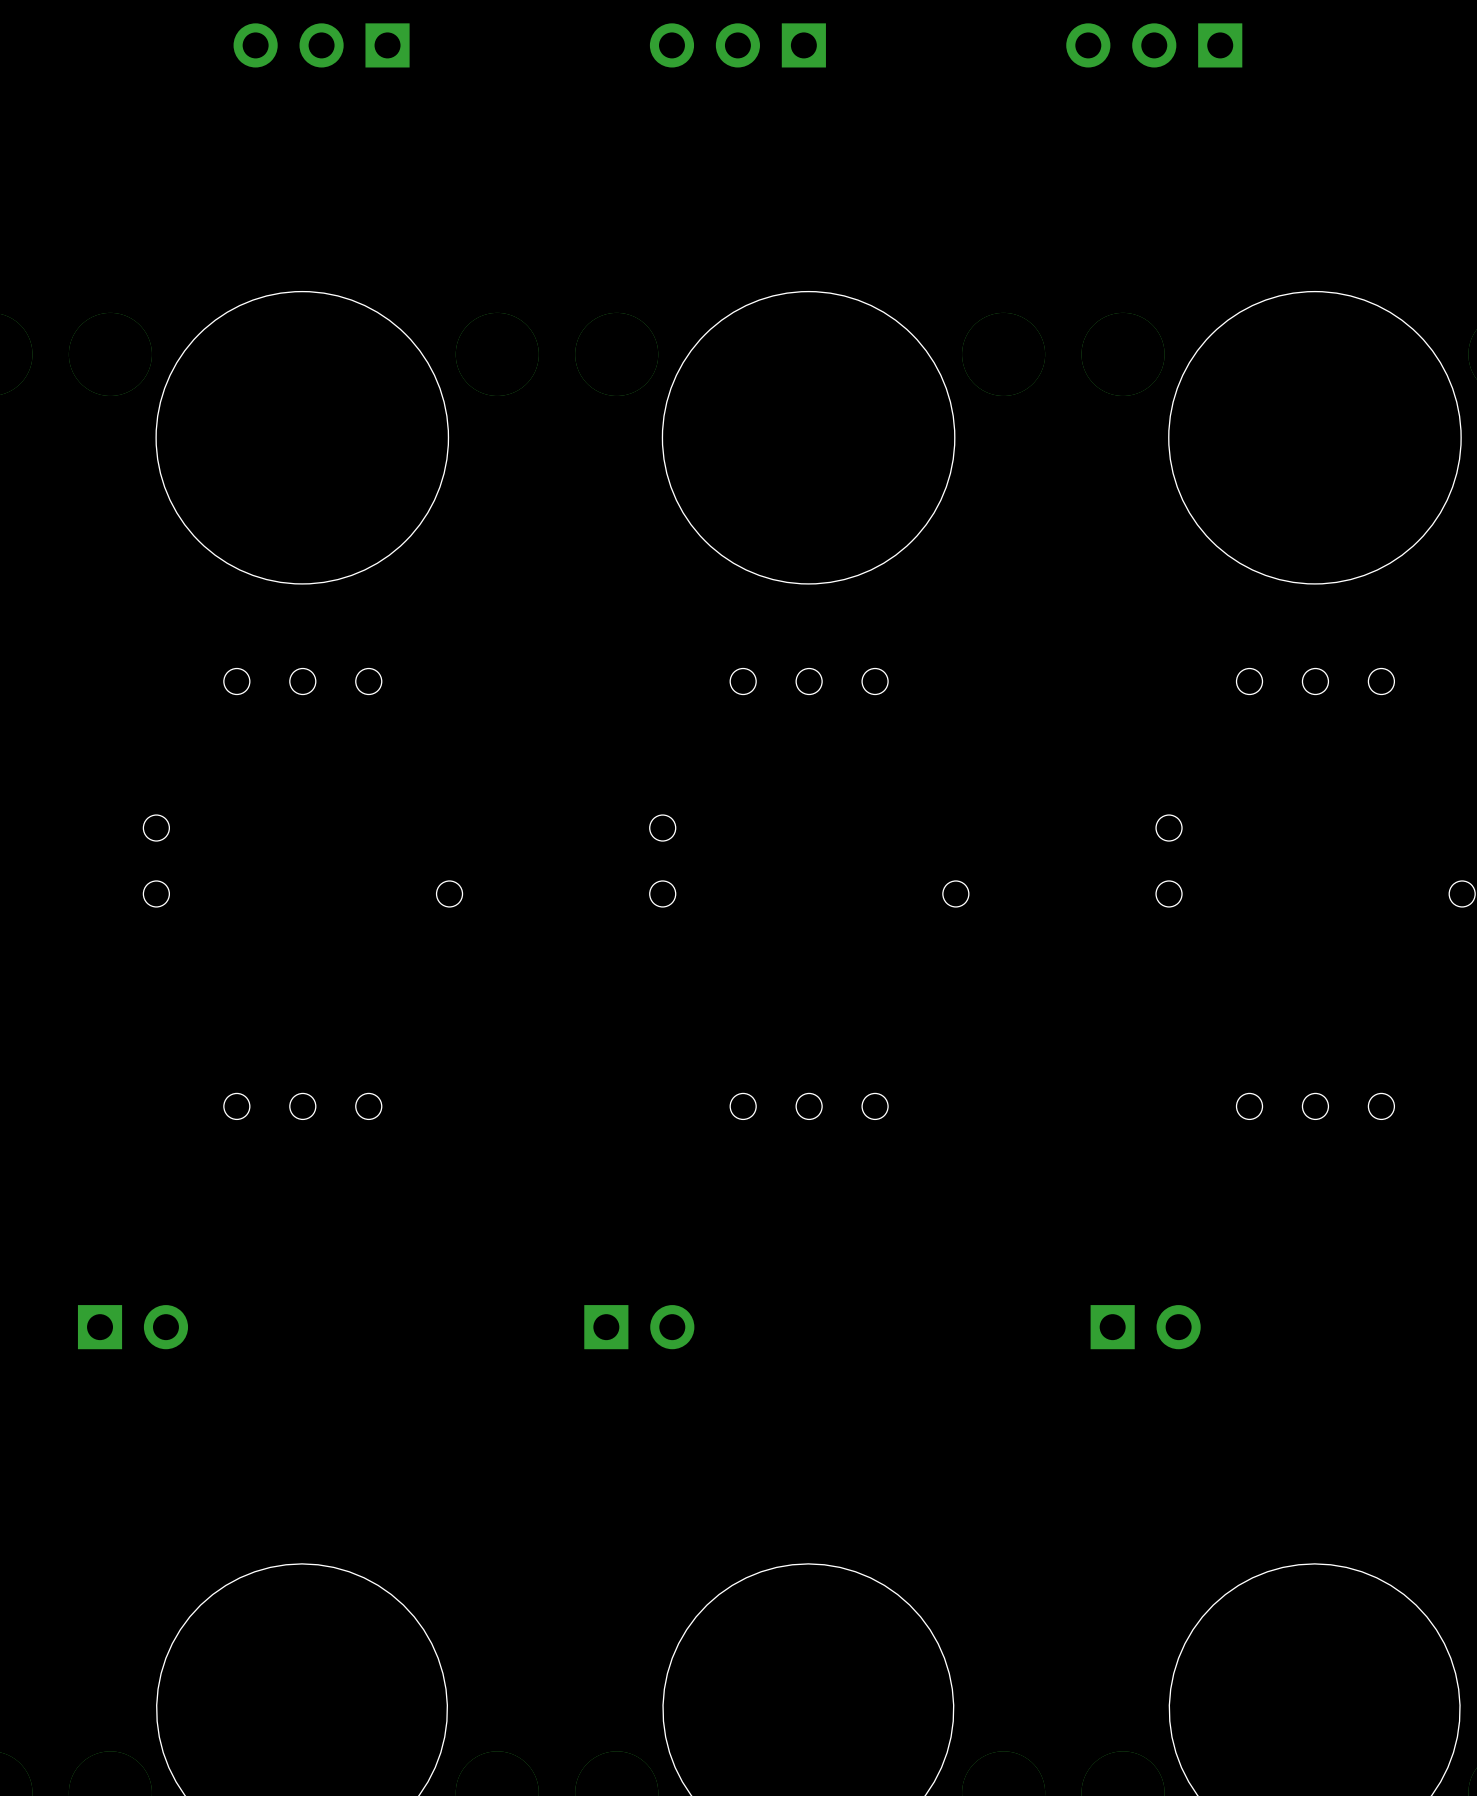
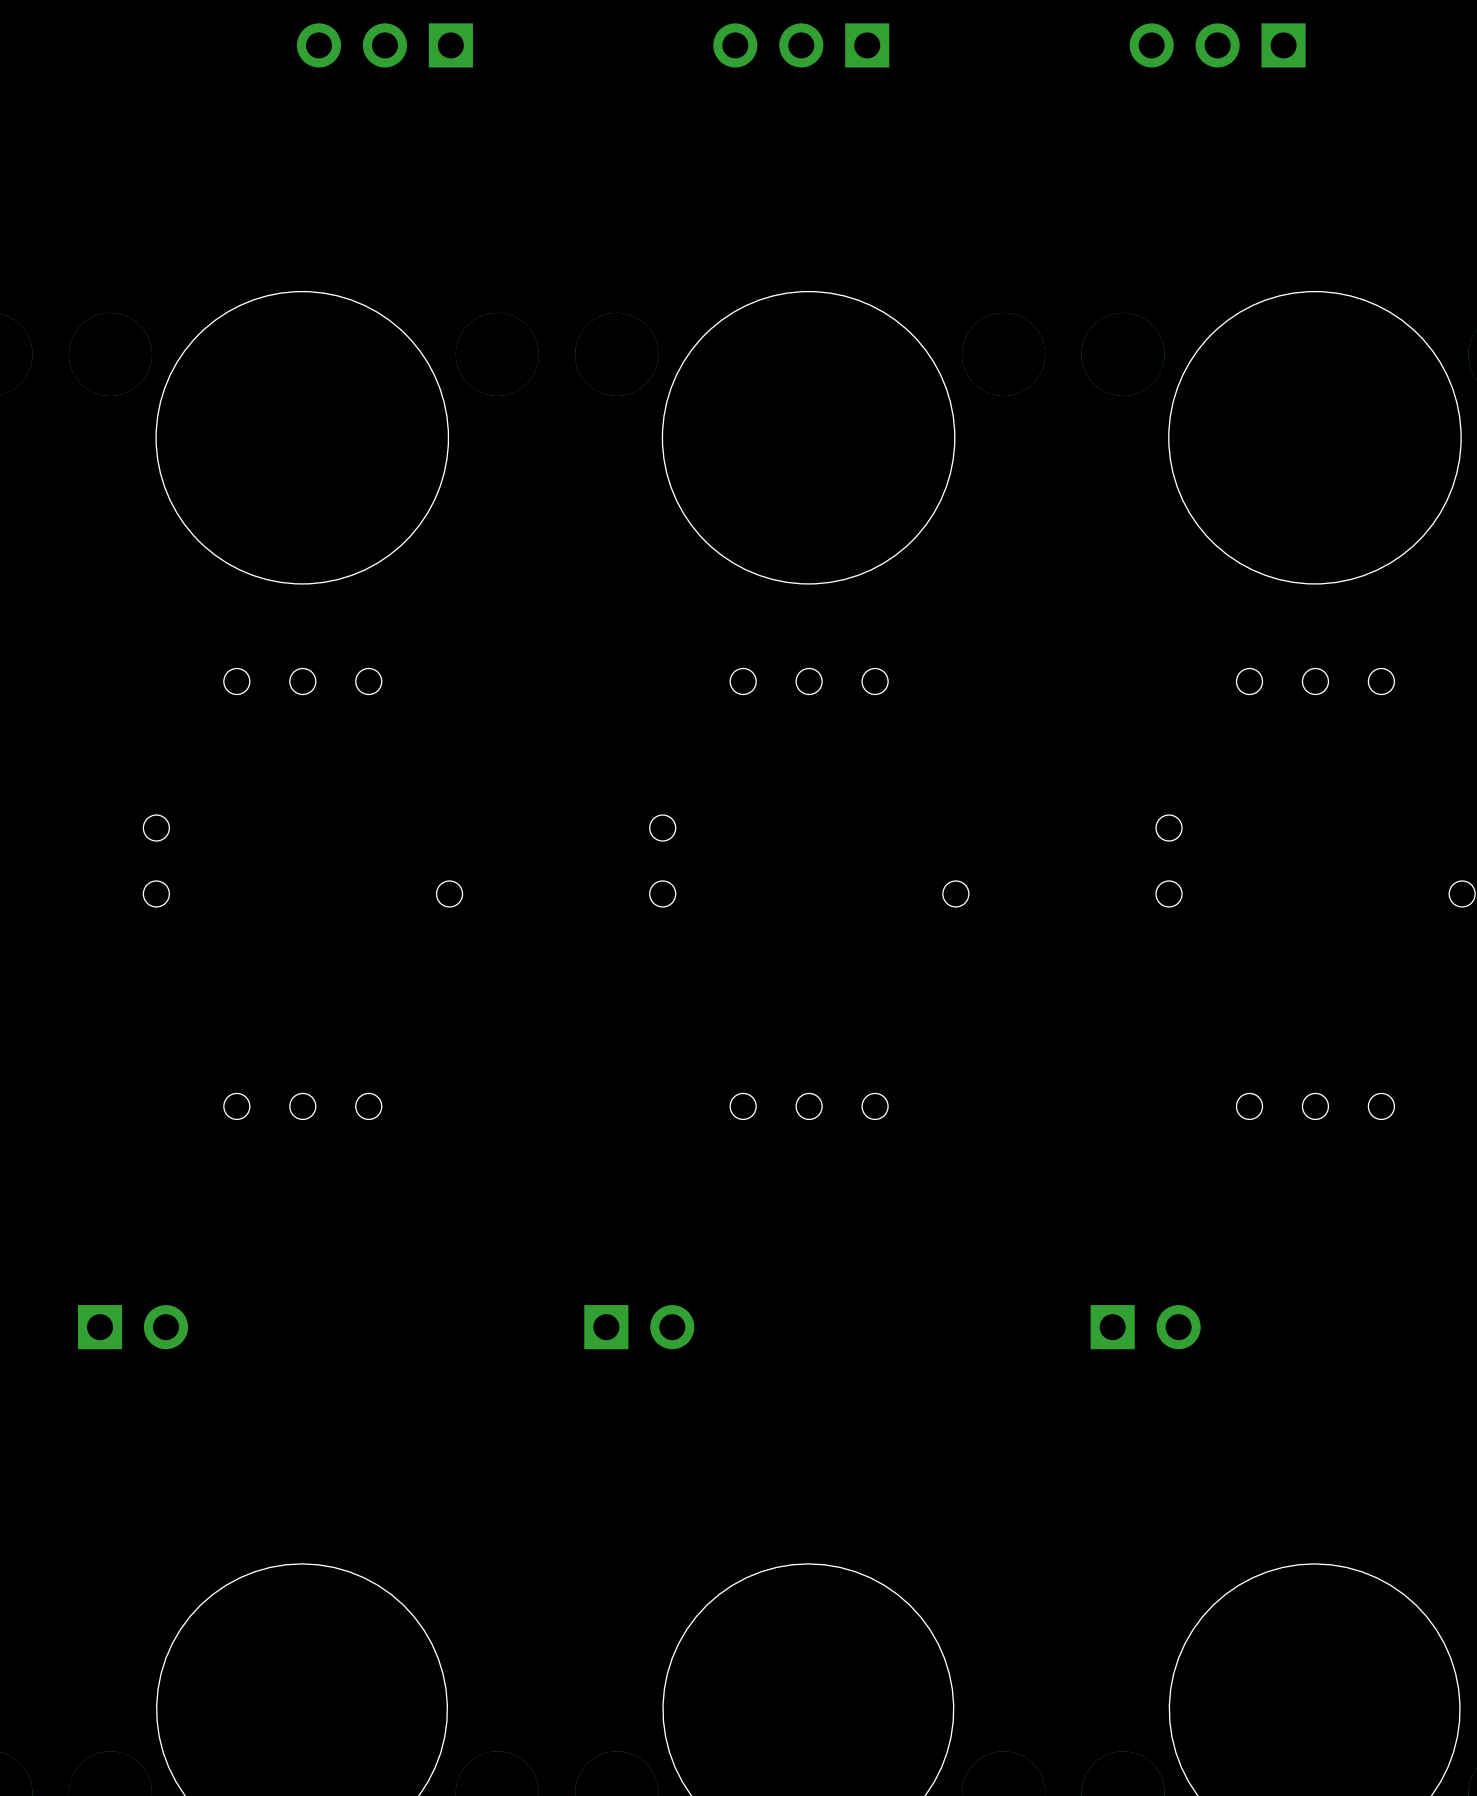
part position: (321, 45) -> (384, 45)
part position: (737, 45) -> (801, 45)
part position: (1154, 45) -> (1217, 45)

